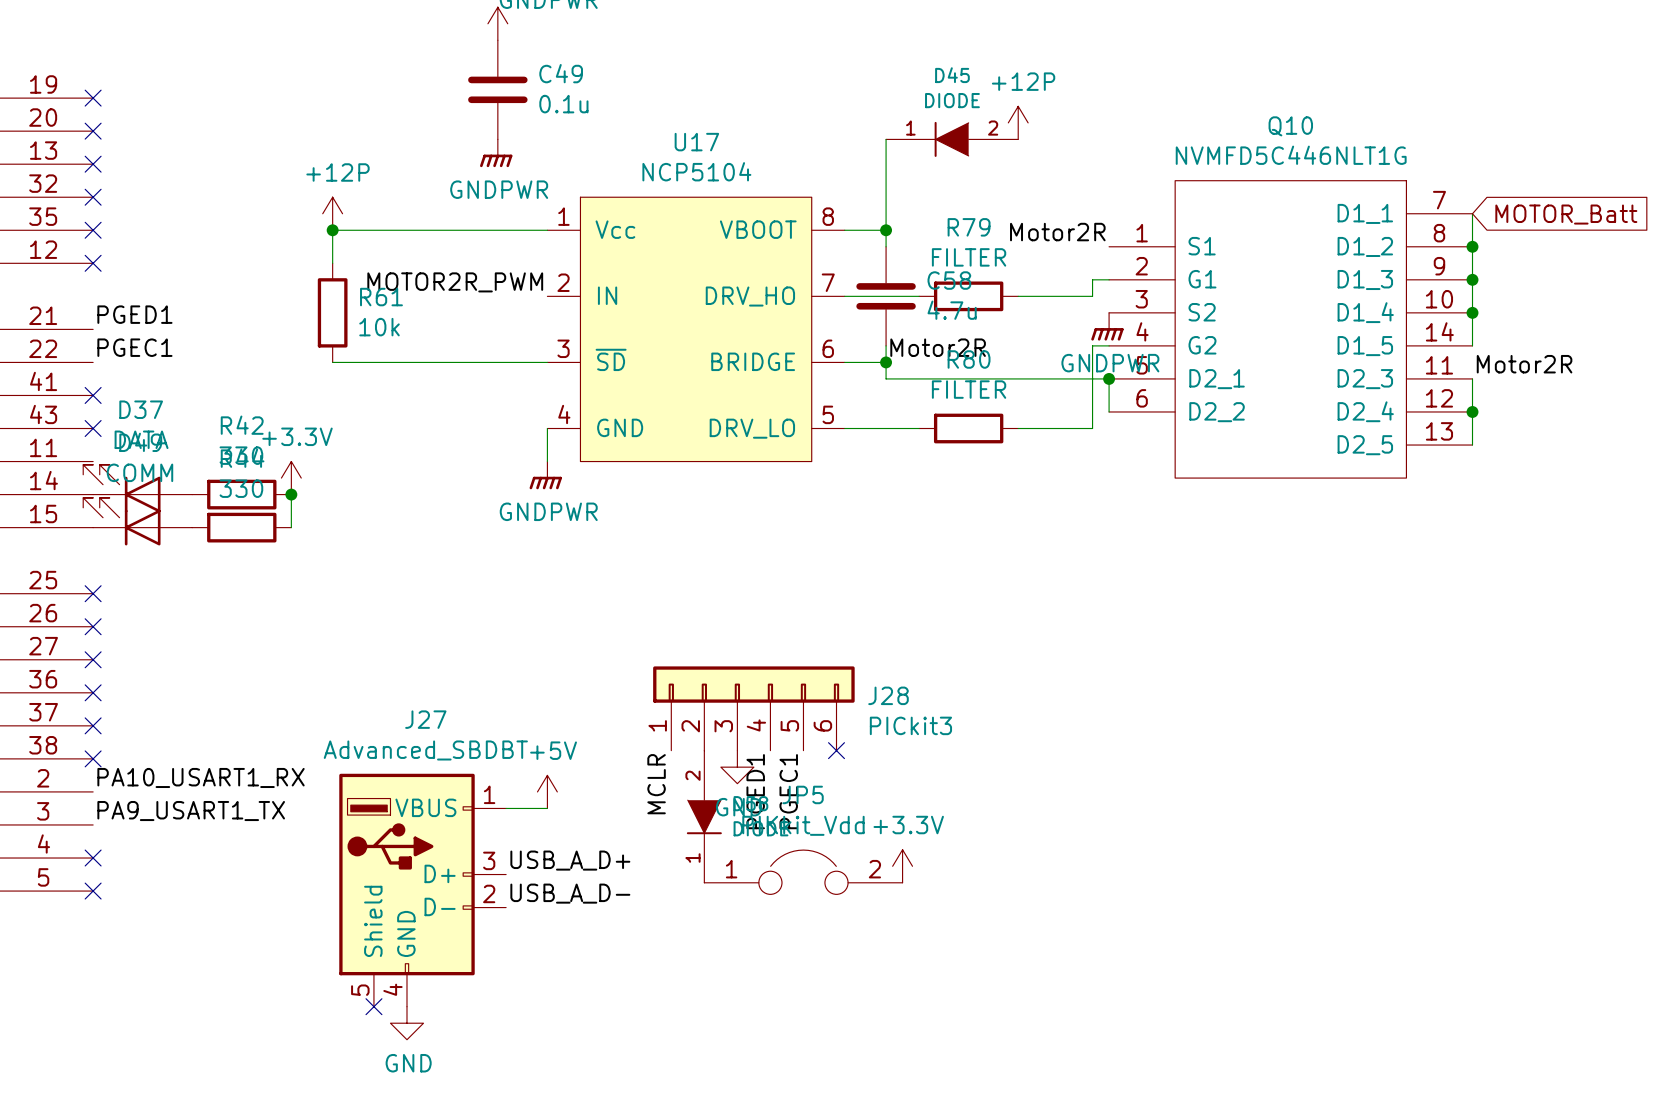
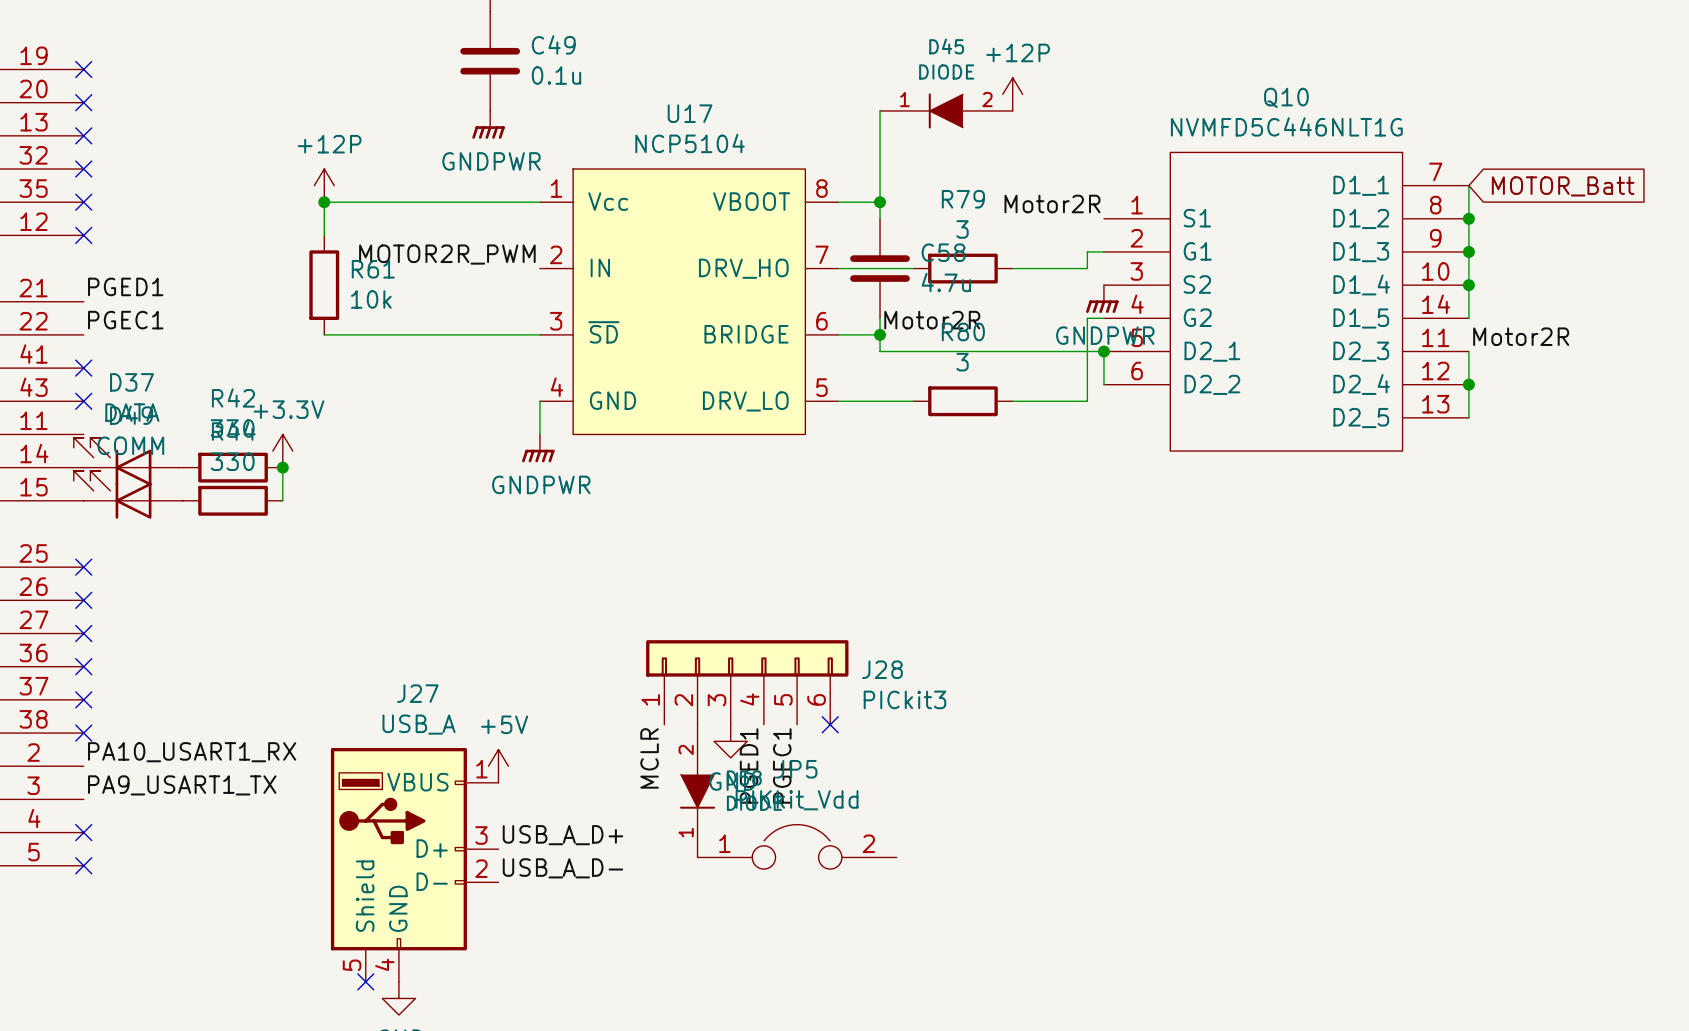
R79 value: FILTER (969, 257) -> 3 (962, 229)
R80 value: FILTER (969, 389) -> 3 (962, 362)
J27 value: Advanced_SBDBT (425, 750) -> USB_A (419, 724)
power symbol position: +5V (547, 791) -> +5V (498, 766)
wire: (506, 808) (547, 808) -> none
power symbol: +3.3V (902, 866) -> none

